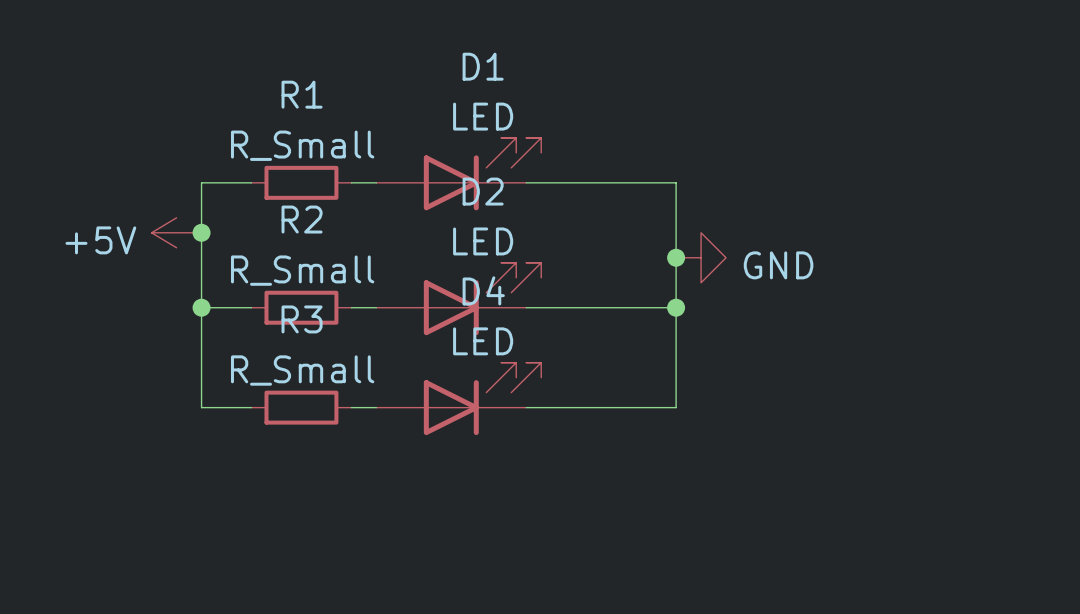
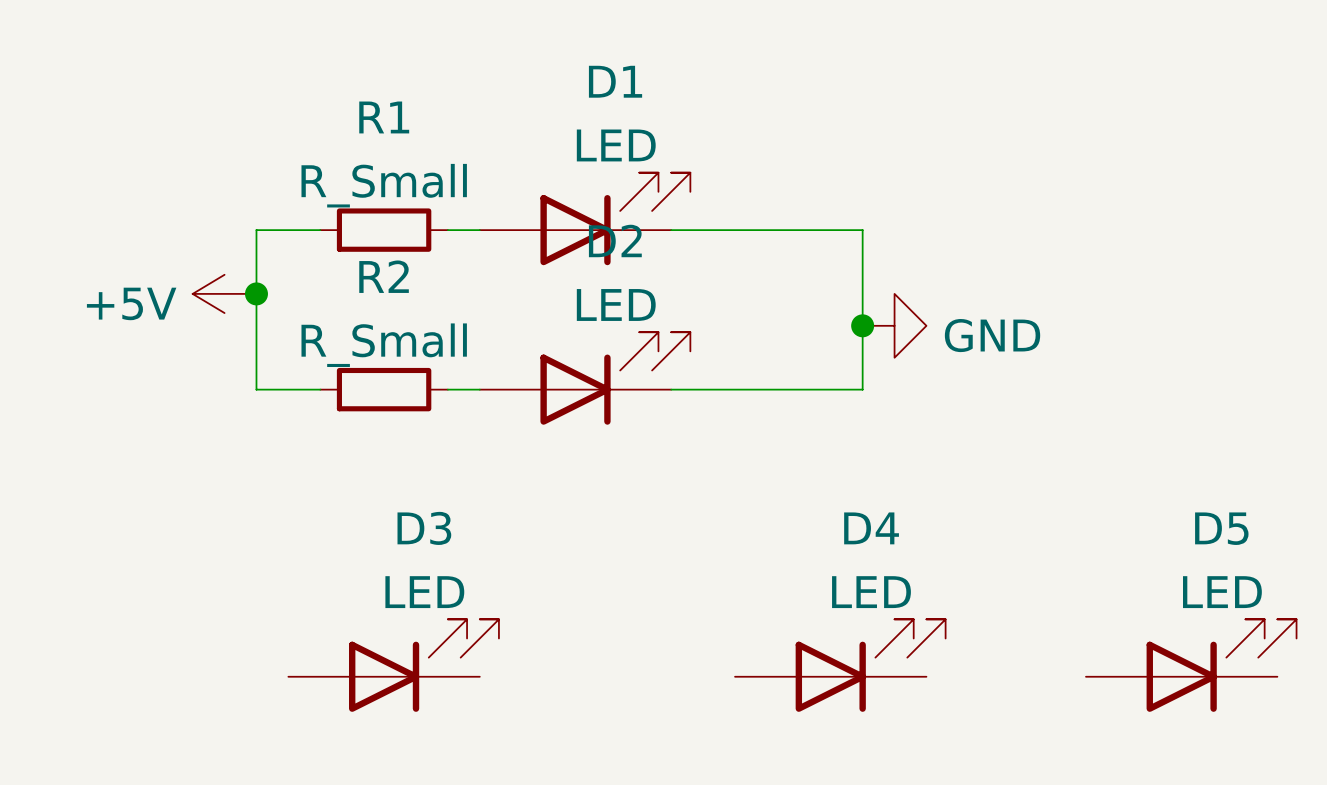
wire: (201, 307) (201, 407) (251, 407) -> none
junction: (201, 307) -> none
wire: (676, 307) (676, 407) (526, 407) -> none
junction: (676, 307) -> none
D4 position: (458, 398) -> (840, 665)
R3: R_Small (301, 407) -> none
wire: (351, 407) (376, 407) -> none
D3: none -> LED (393, 665)
D5: none -> LED (1191, 665)

